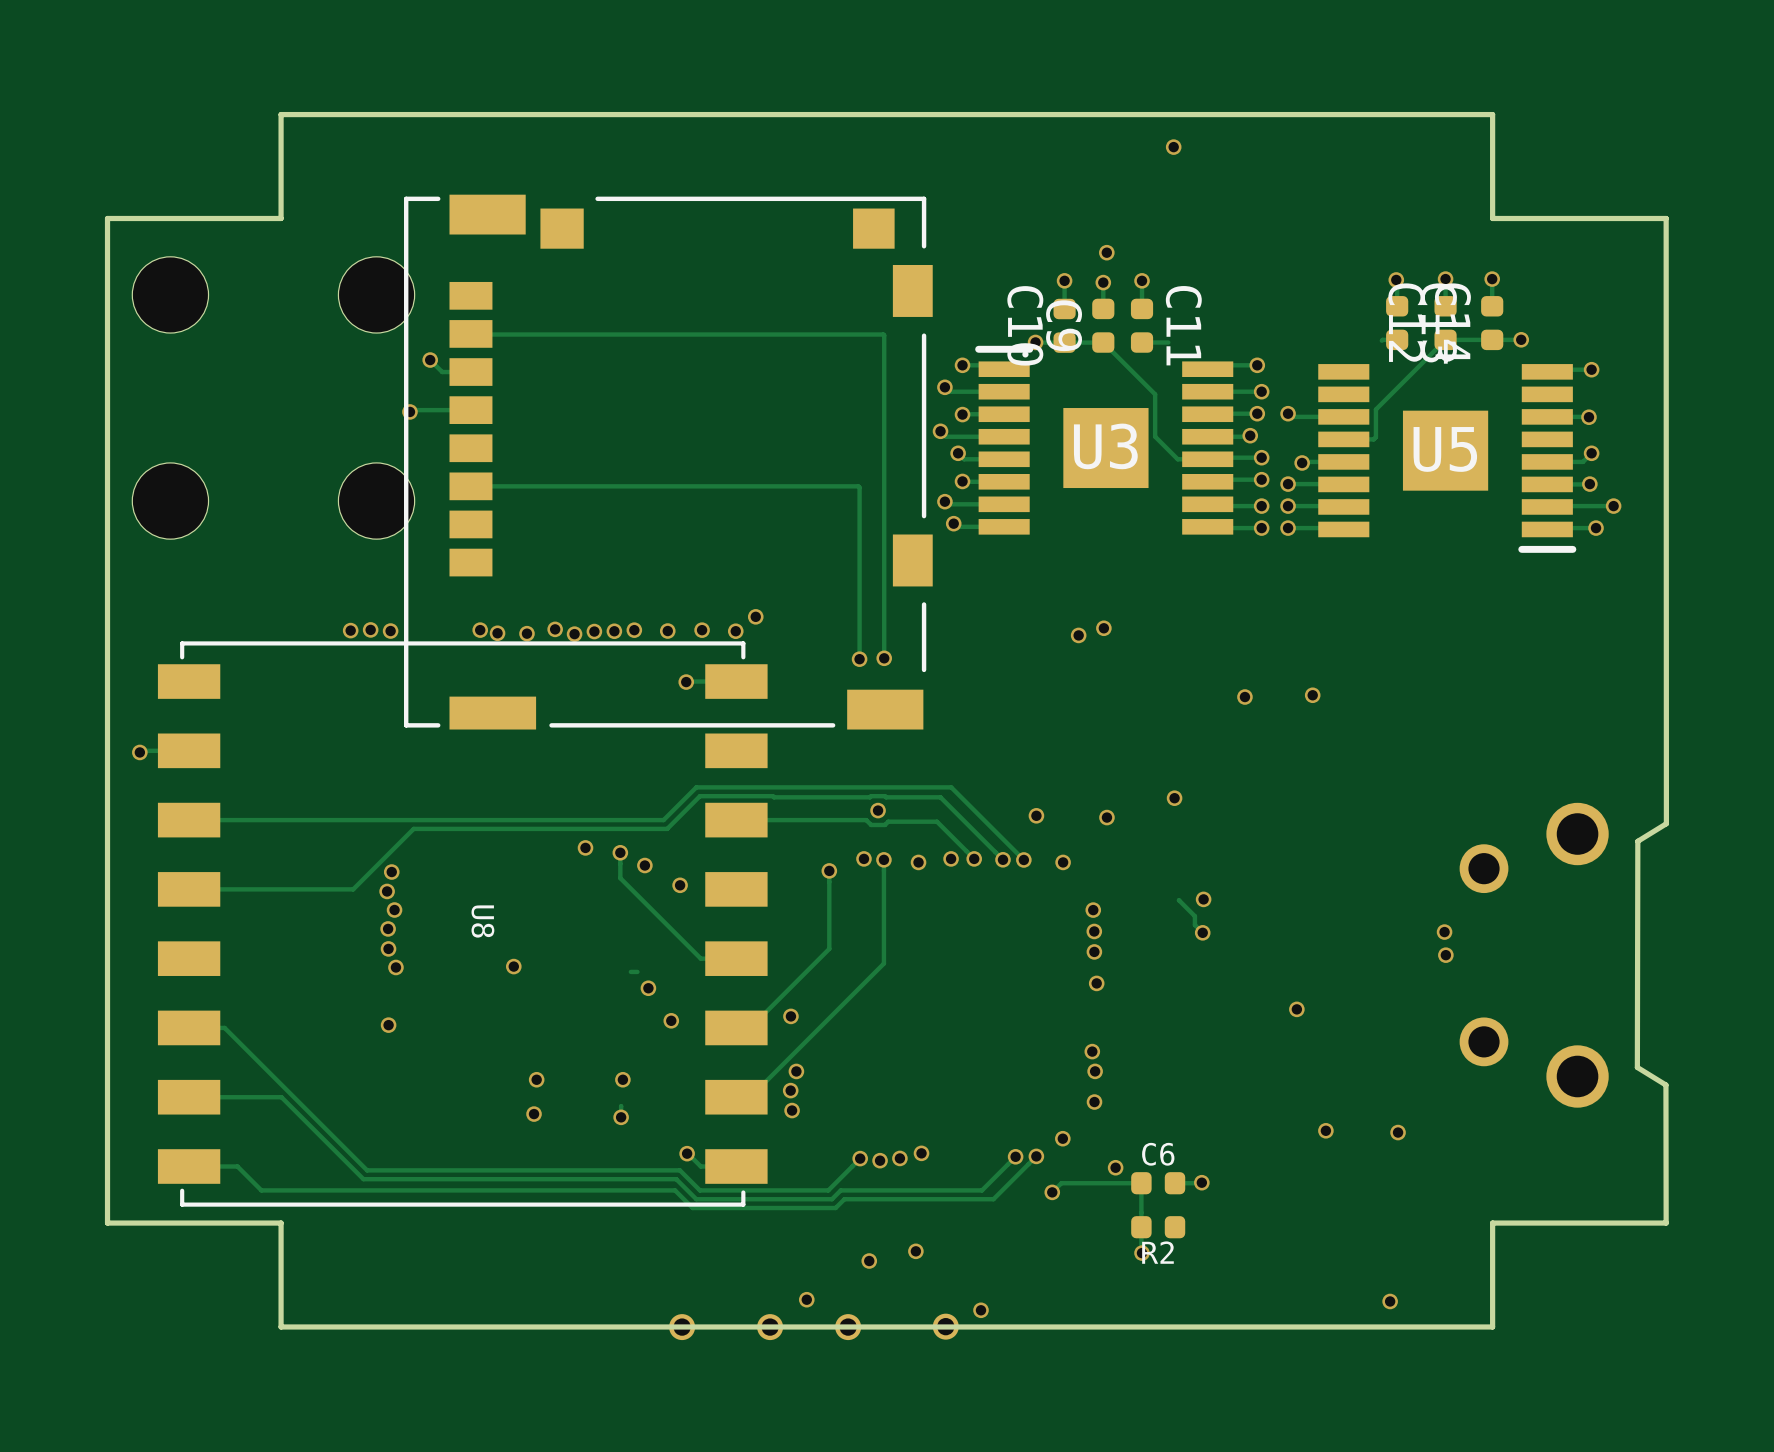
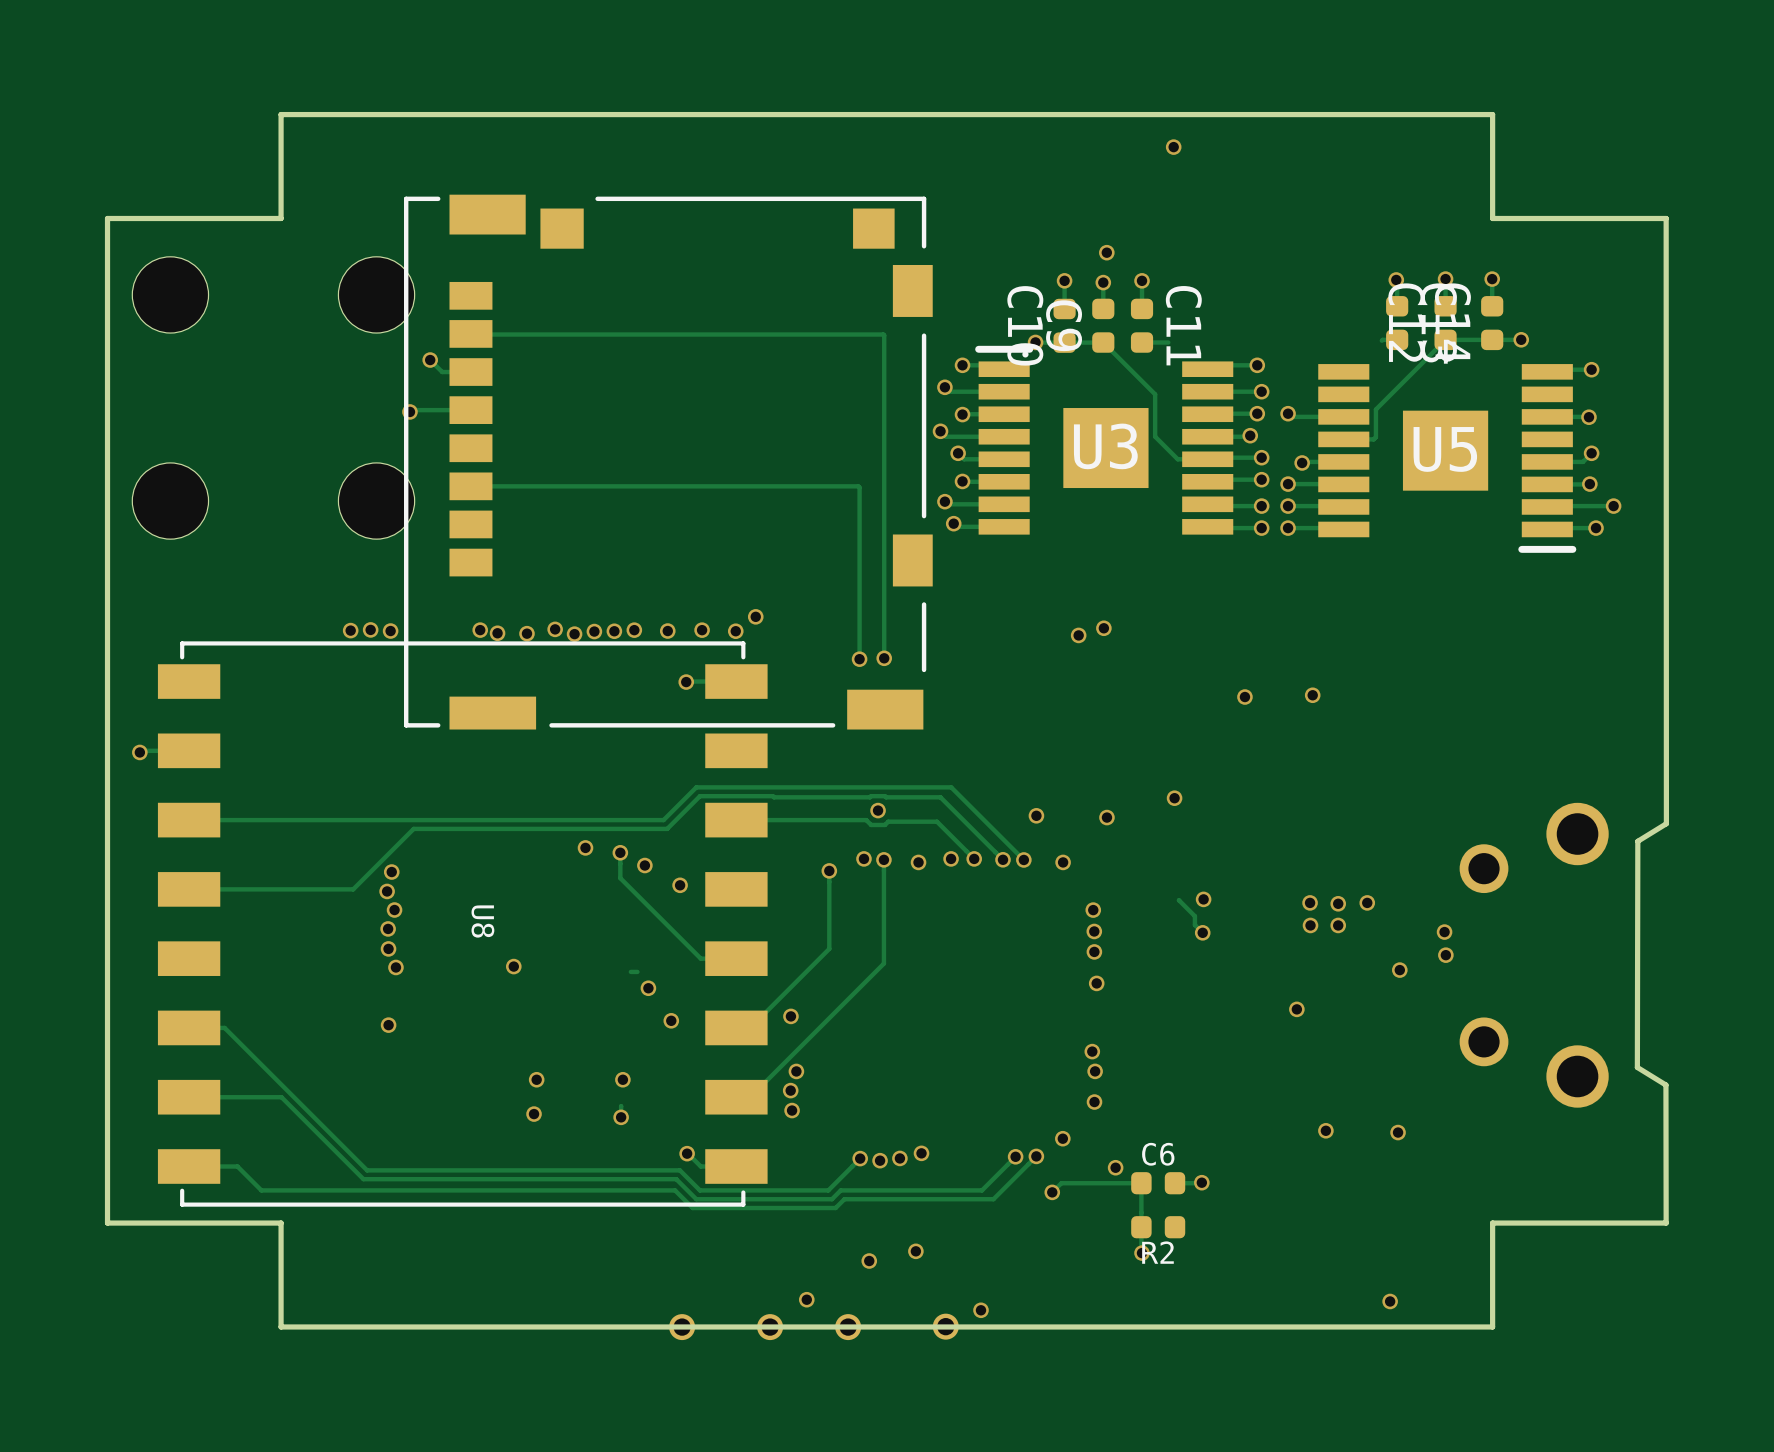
via: none -> (1310, 902)
via: none -> (1367, 902)
via: none -> (1338, 903)
via: none -> (1310, 925)
via: none -> (1338, 925)
via: none -> (1399, 970)

